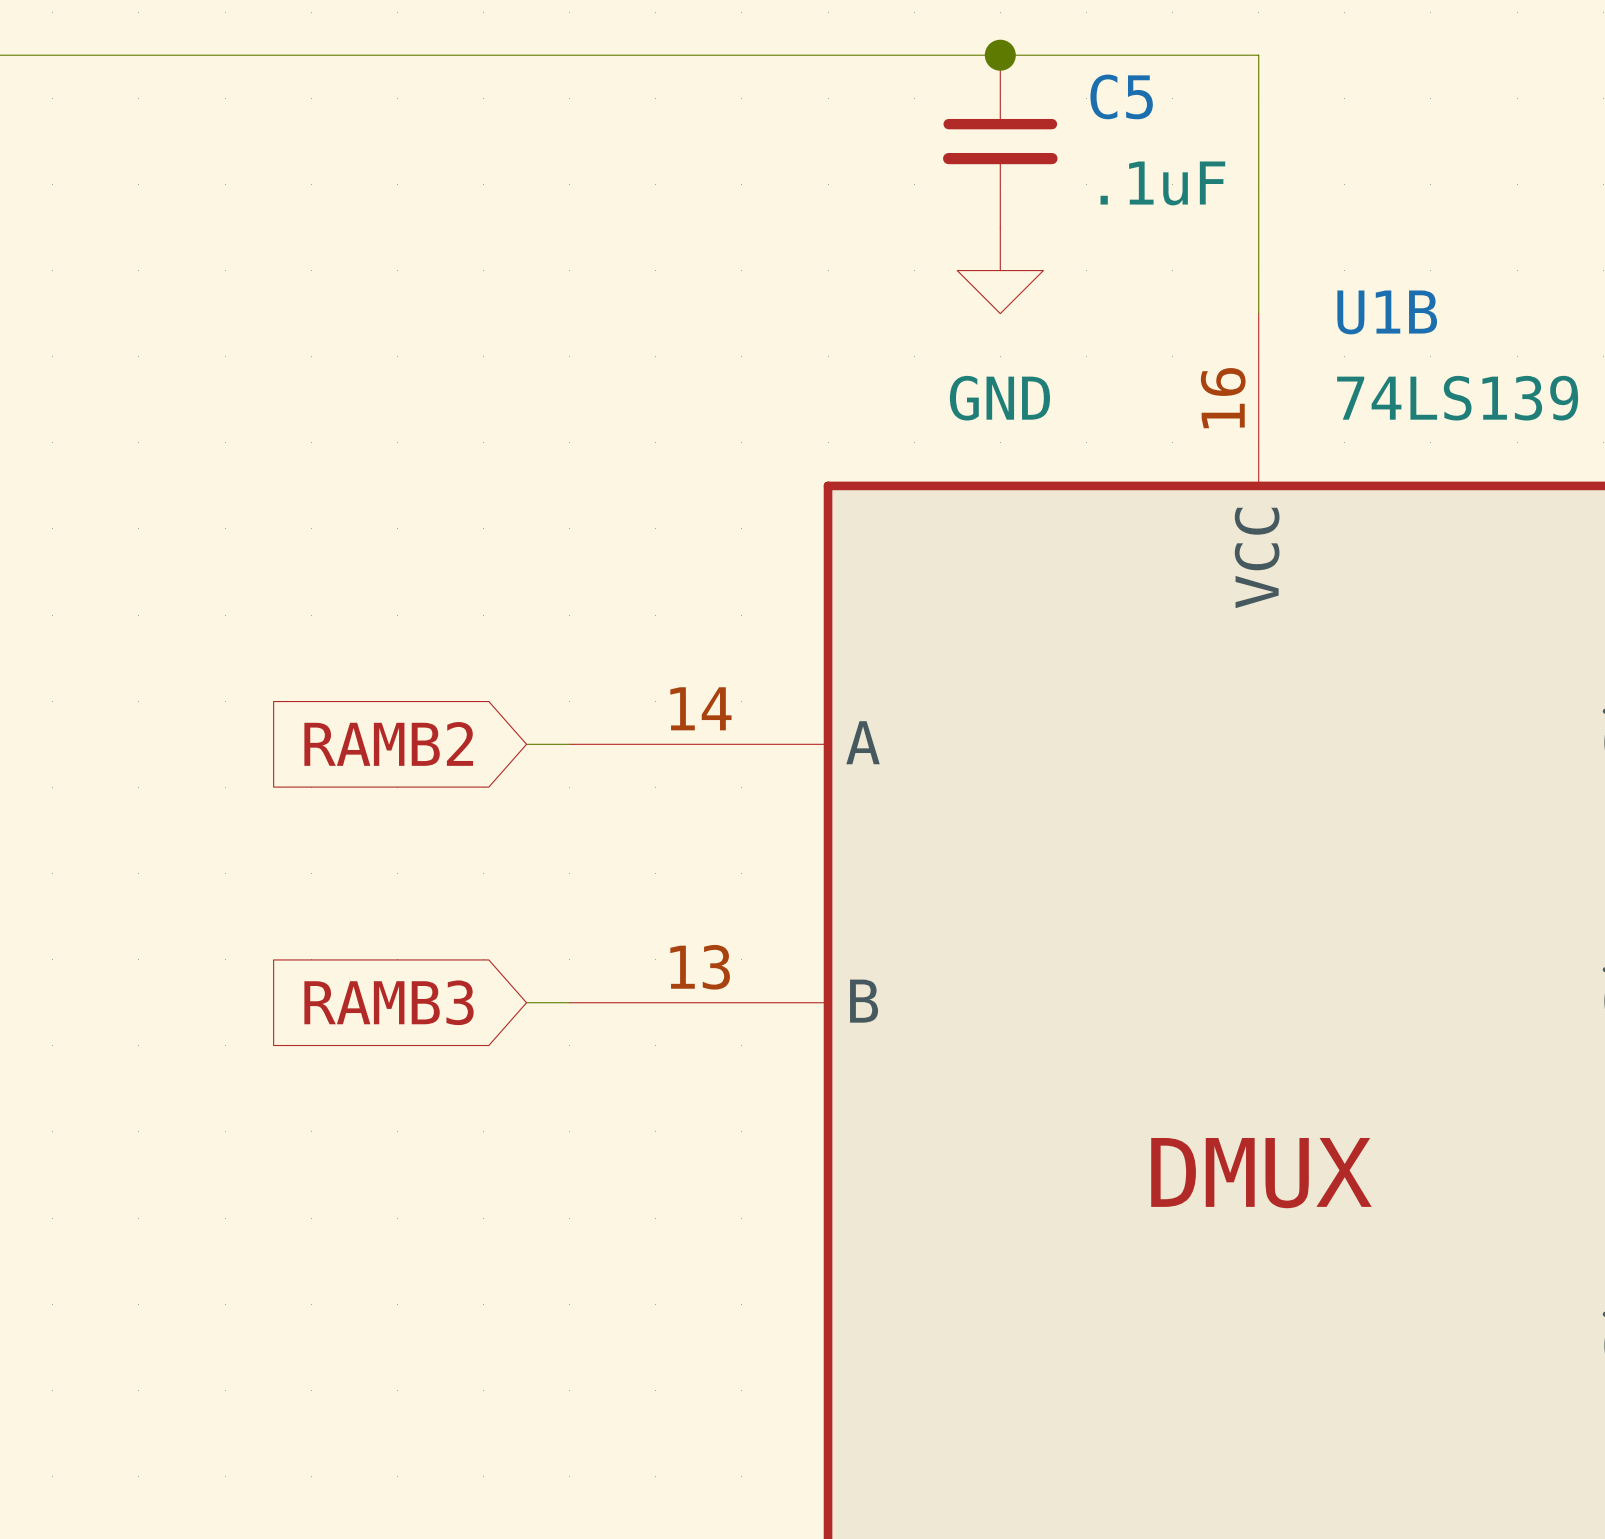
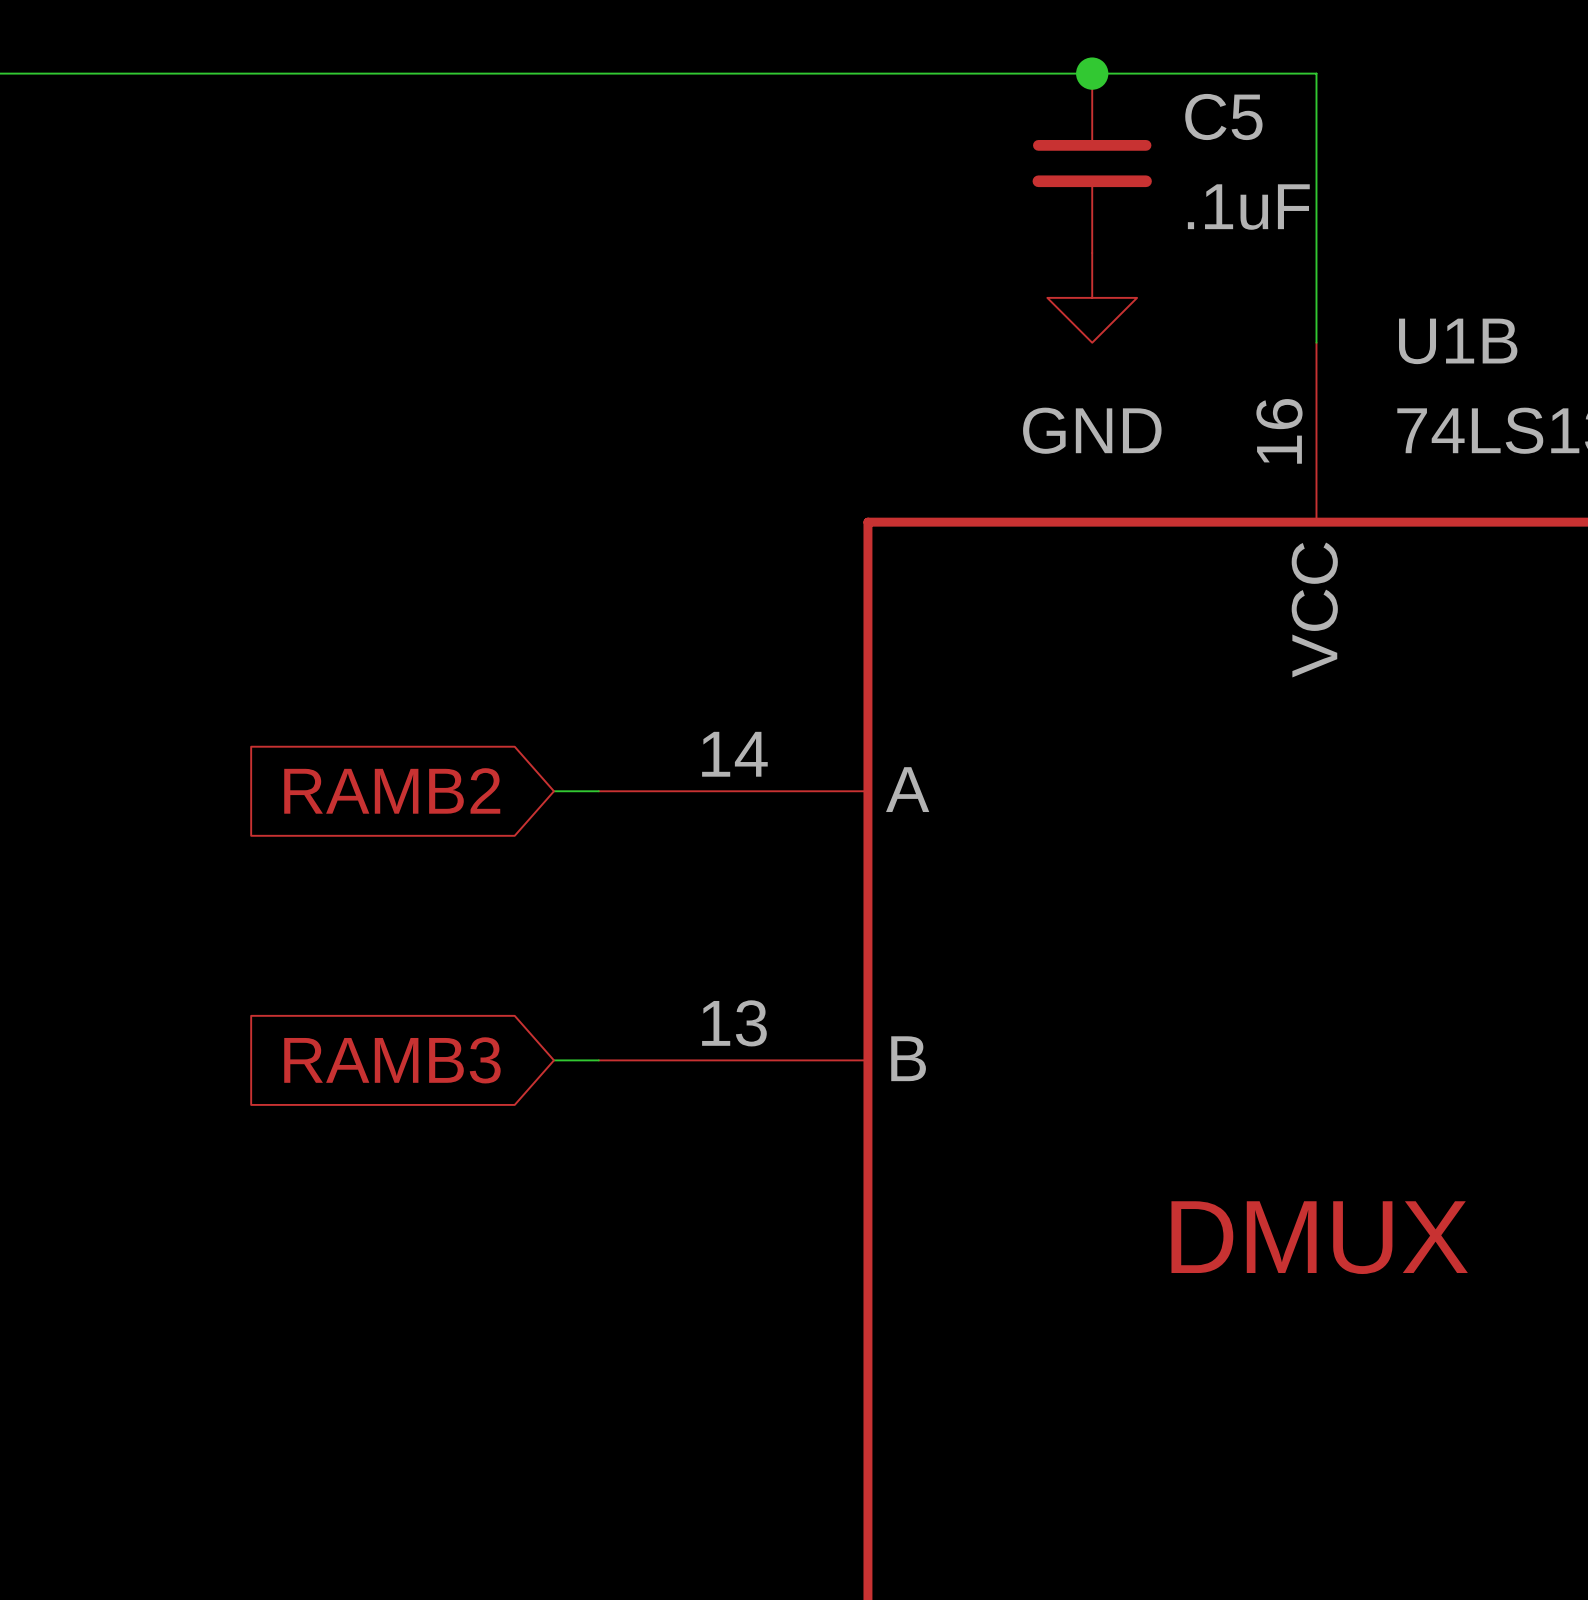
junction position: (1000, 55) -> (1092, 73)
C5 position: (1000, 141) -> (1092, 163)
power symbol position: GND (1000, 270) -> GND (1092, 297)

